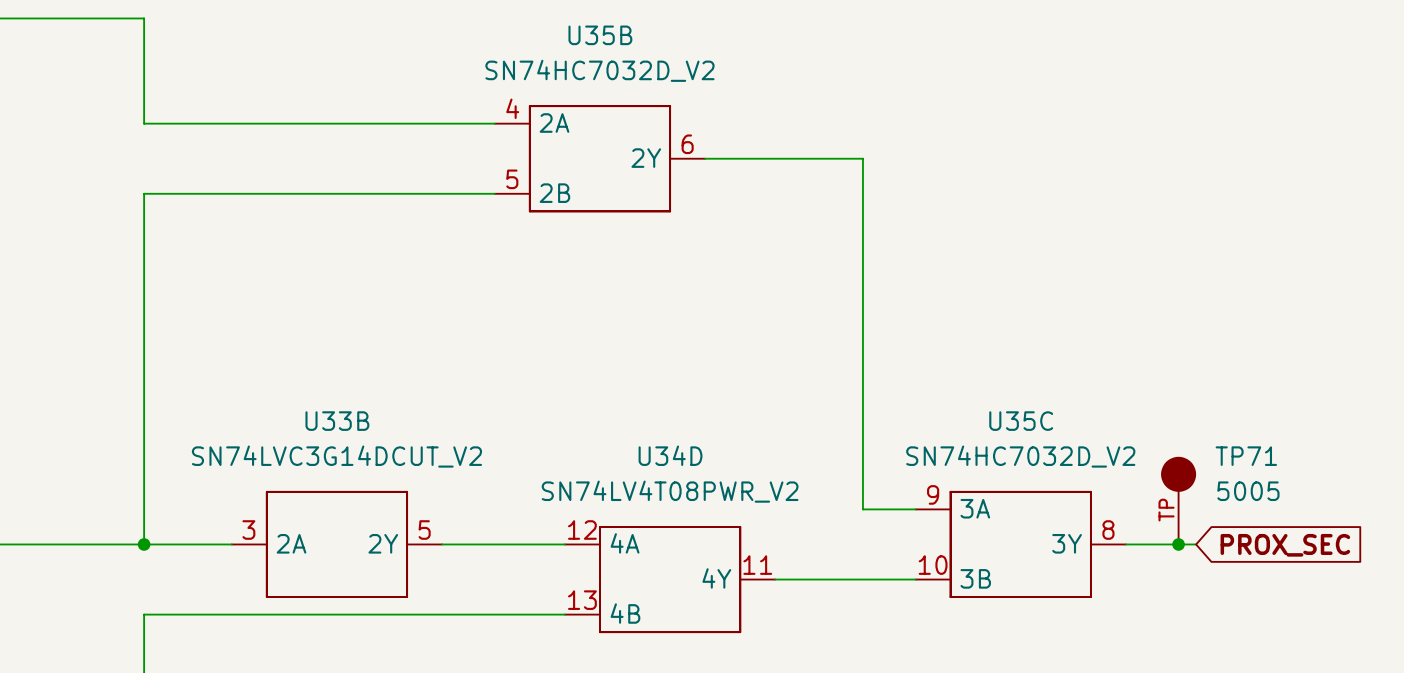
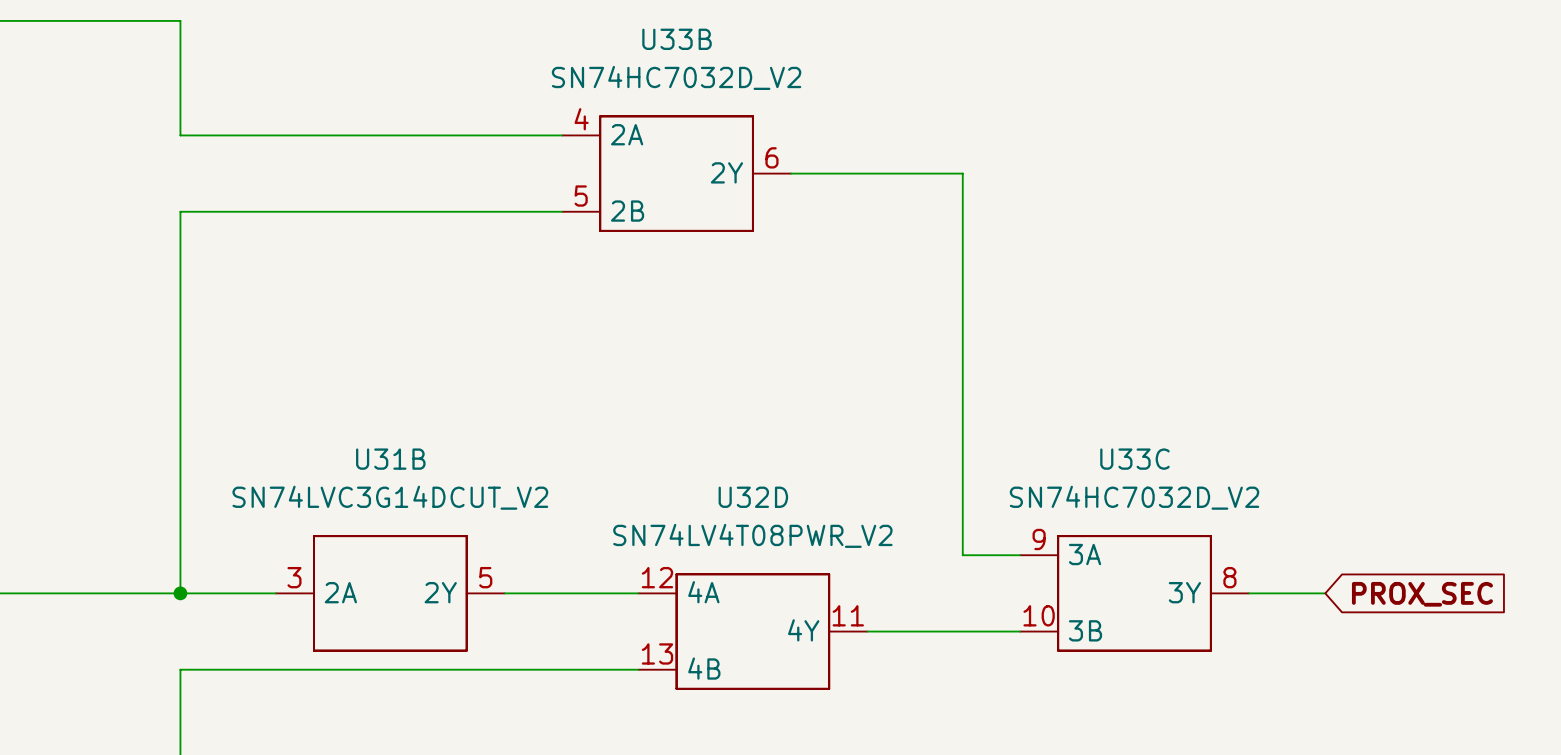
U35B name: U35B (600, 35) -> U33B (677, 39)
U33B name: U33B (337, 421) -> U31B (390, 459)
U35C name: U35C (1021, 421) -> U33C (1134, 459)
U34D name: U34D (670, 455) -> U32D (753, 497)
TP71: 5005 (1178, 500) -> none
junction: (1178, 544) -> none

